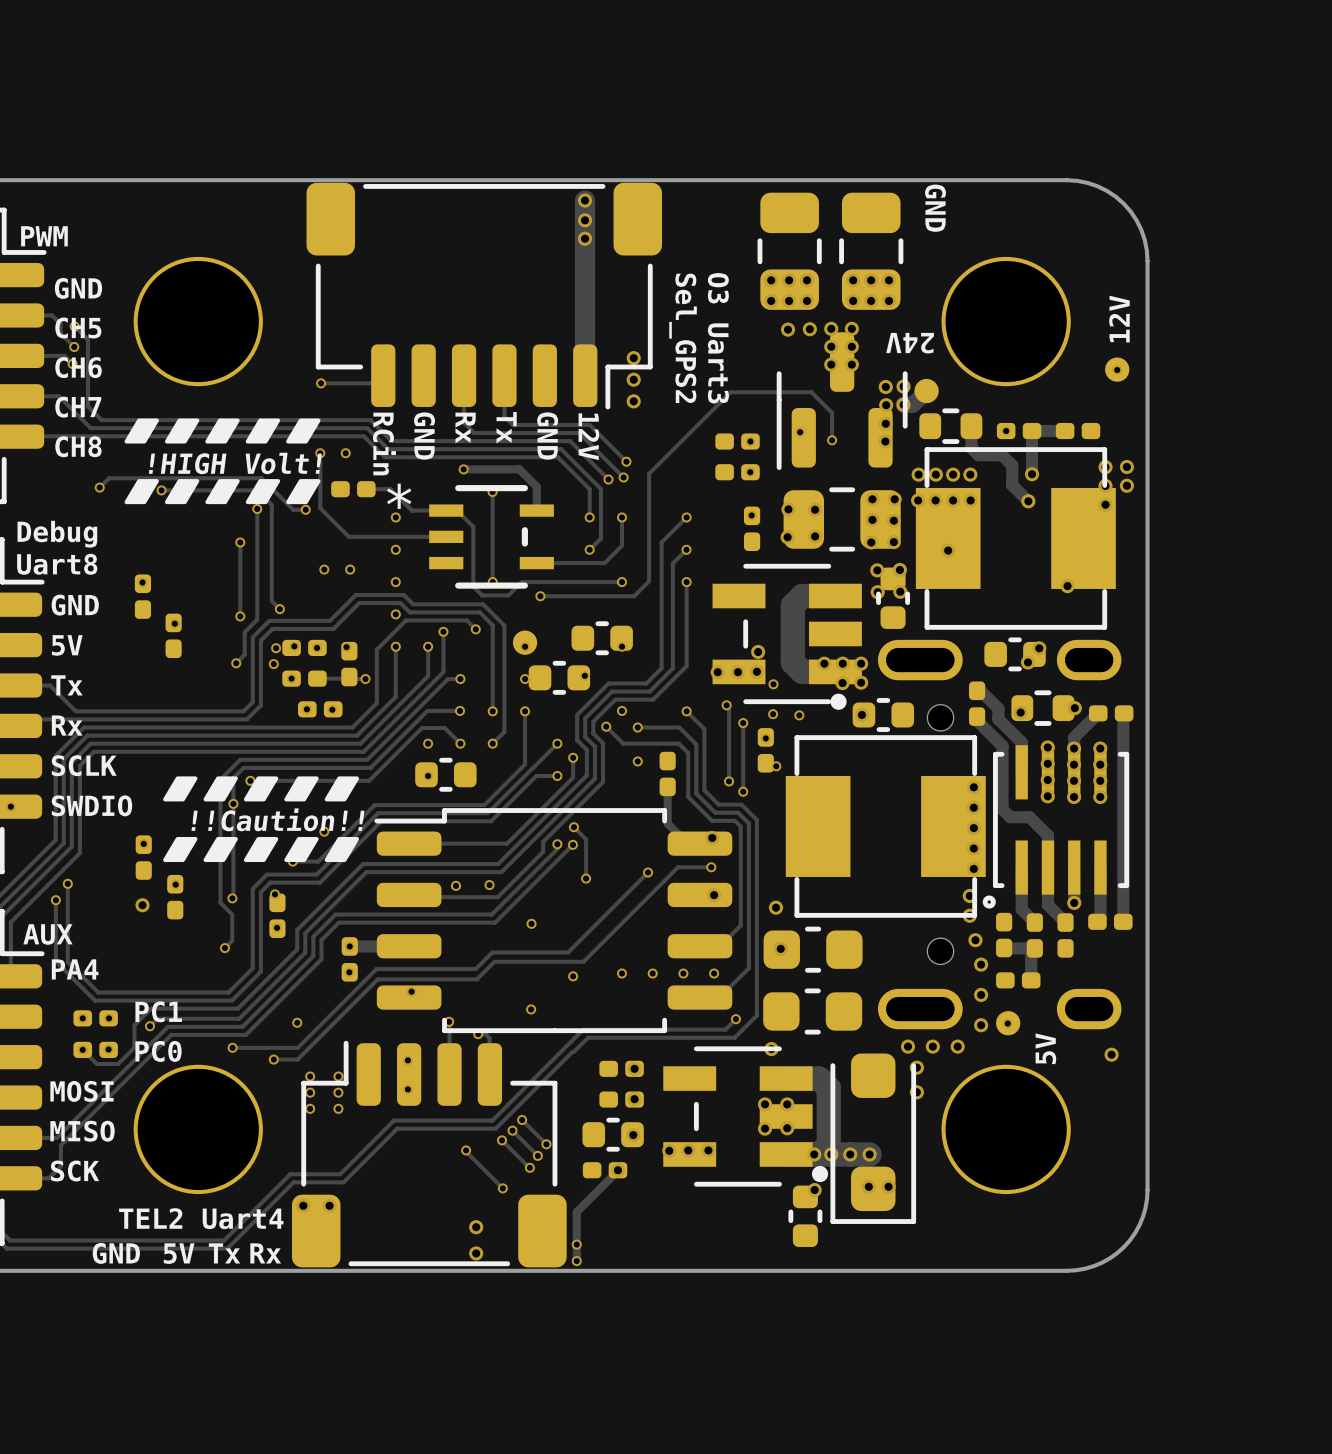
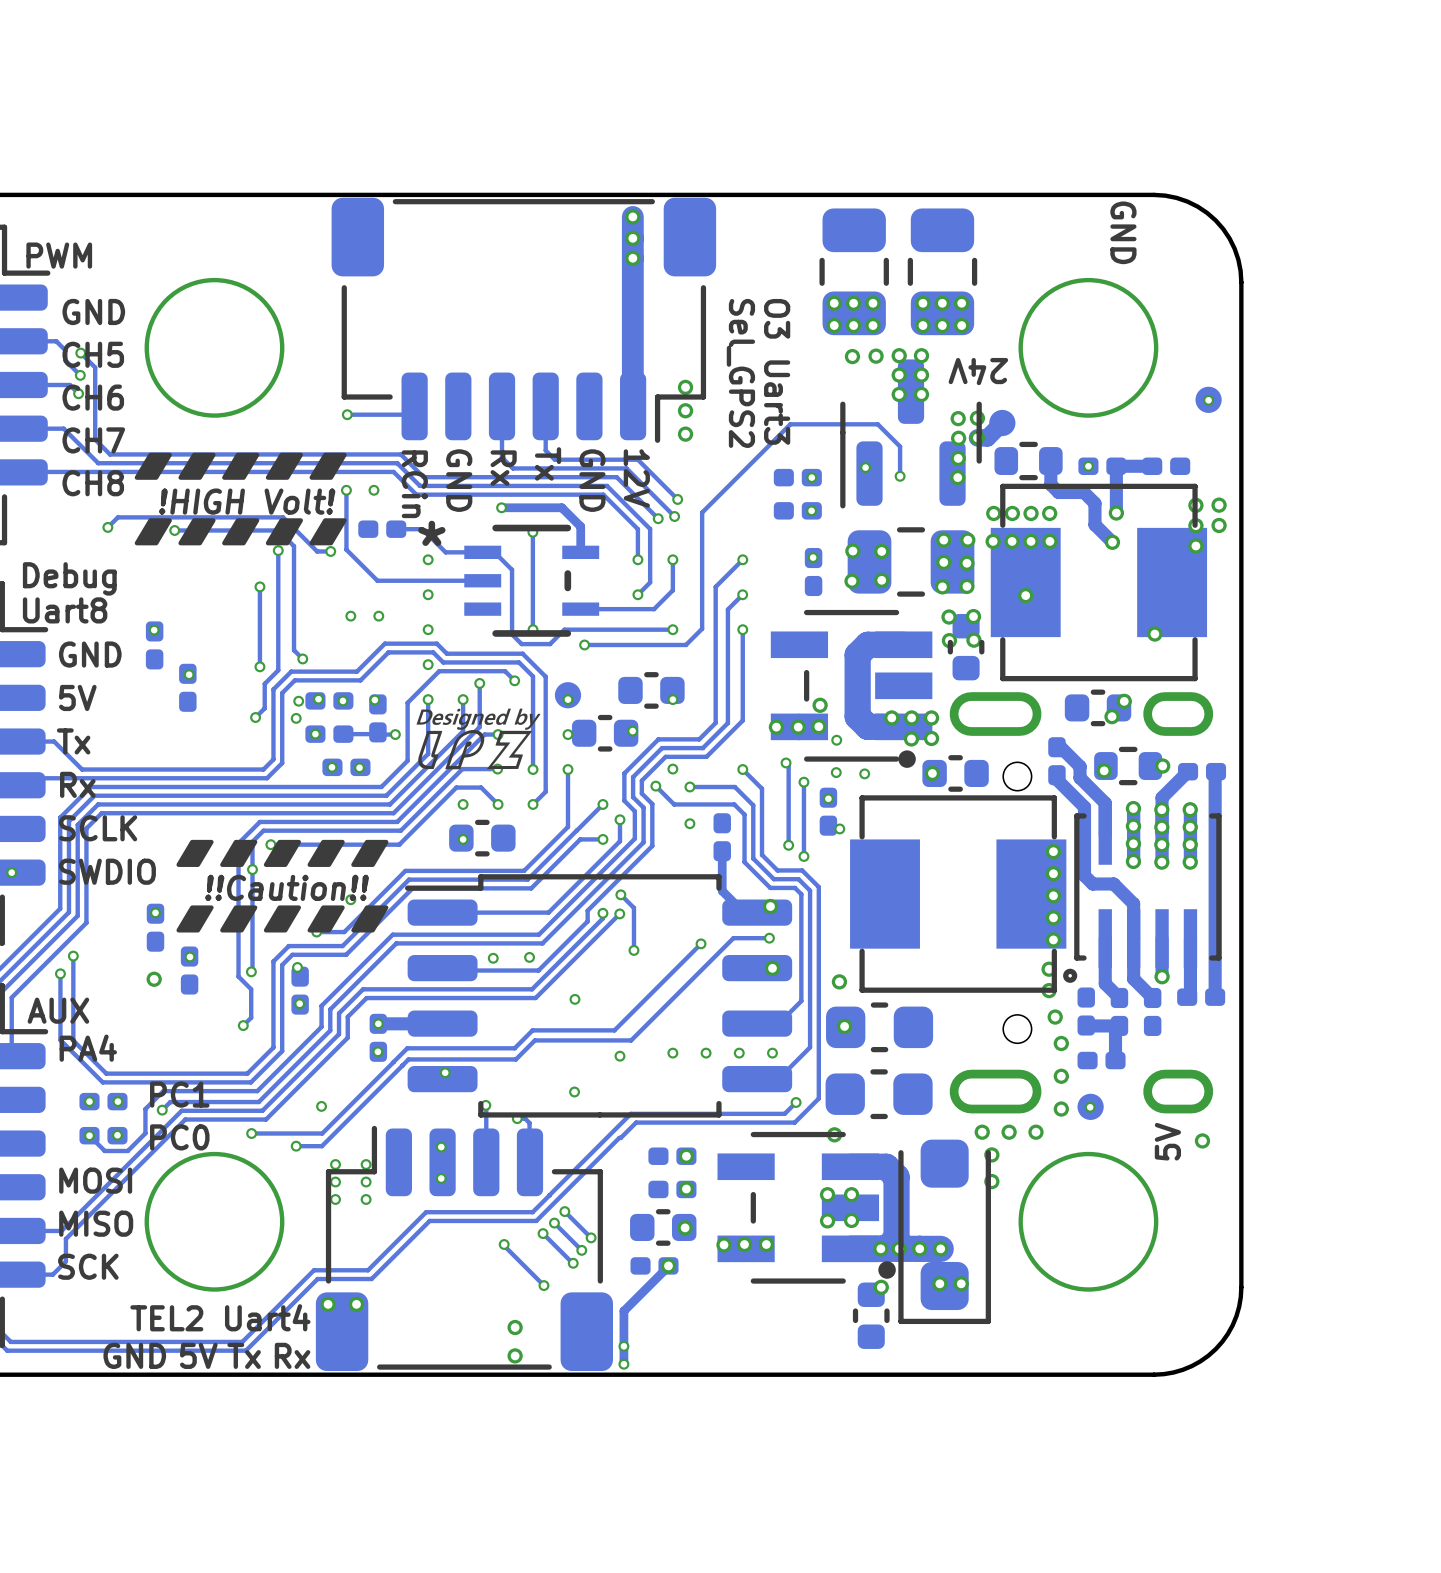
text position: GND (935, 208) -> GND (1123, 232)
text: 12V (1119, 319) -> none
drawing: none -> [416, 708, 541, 770]
text position: 5V (1045, 1048) -> 5V (1167, 1141)

